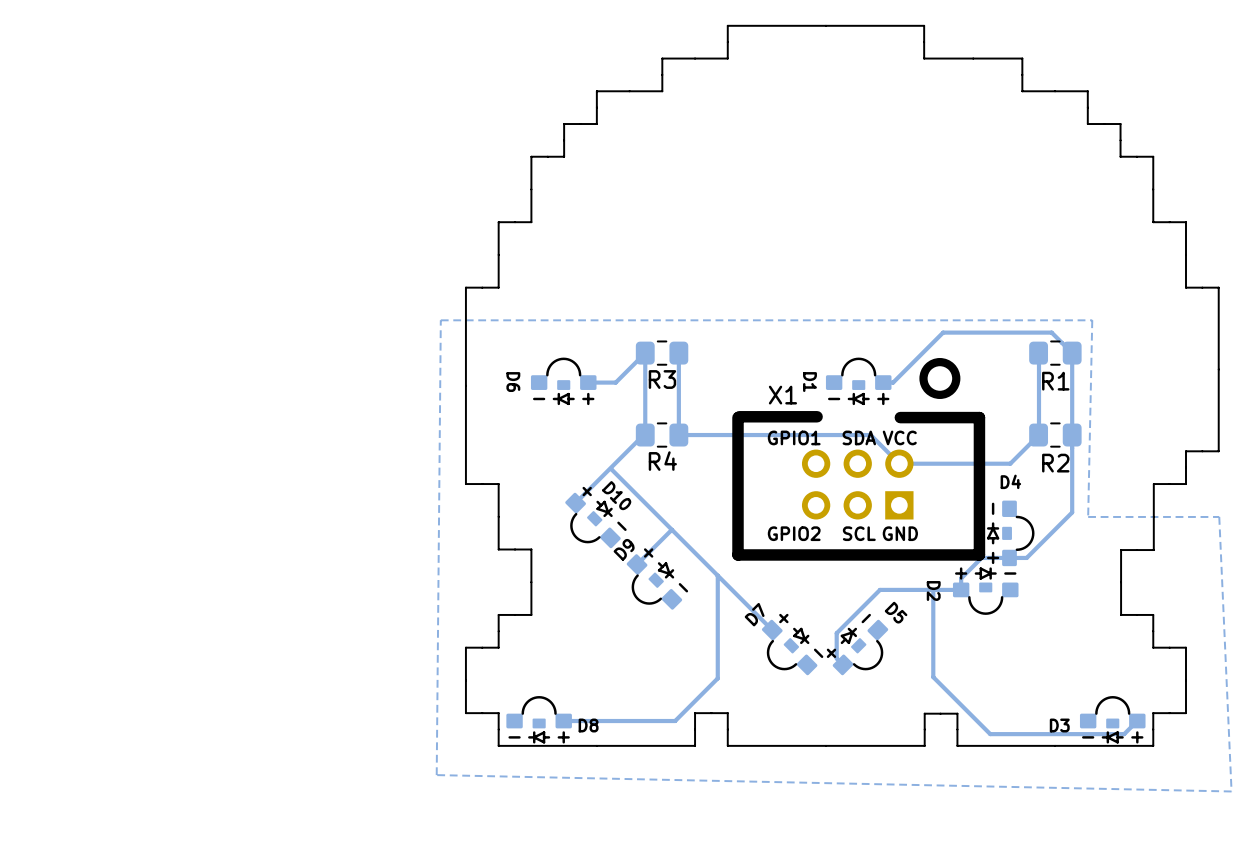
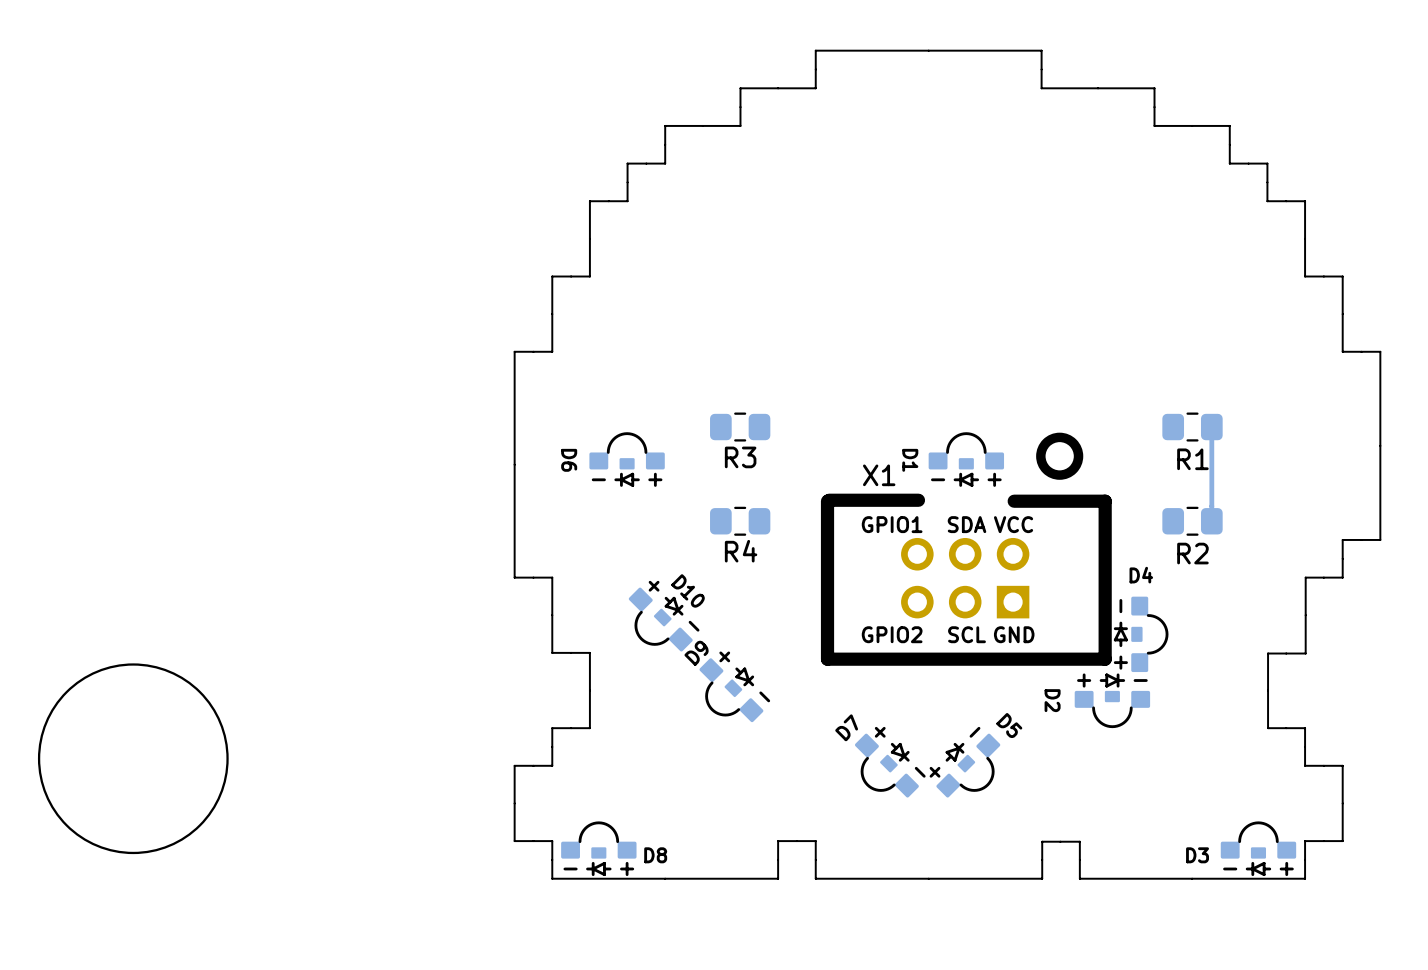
zone outline: (1092, 320) (440, 320) (436, 775) (1231, 791) (1219, 516) (1088, 516) (1092, 320) -> none
track: (1039, 353) (1039, 435) (1010, 463) (899, 463) (870, 435) (682, 435) (678, 431) (678, 353) -> none
track: (1072, 353) (1051, 332) (943, 332) (893, 382) (883, 382) -> none
track: (588, 382) (615, 382) (645, 353) (645, 435) (575, 503) -> none
track: (1072, 435) (1072, 512) (1026, 557) (981, 557) (961, 578) (961, 586) (957, 589) (880, 589) (836, 633) (836, 658) (843, 664) -> none
track: (611, 469) (772, 630) -> none
track: (672, 529) (637, 564) -> none
drawing: none -> [37, 663, 229, 855]
track: (717, 575) (717, 678) (675, 721) (563, 721) -> none
track: (933, 589) (933, 677) (990, 734) (1124, 734) (1137, 721) -> none

